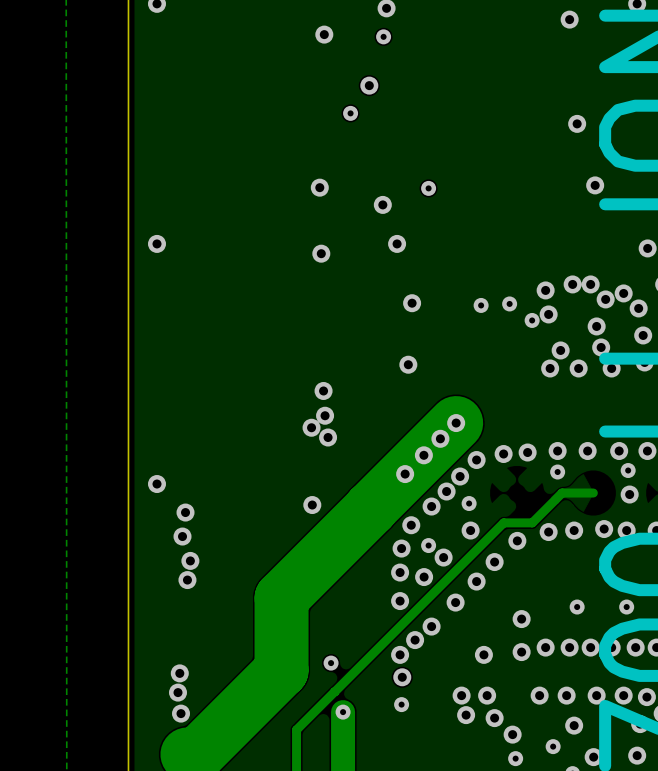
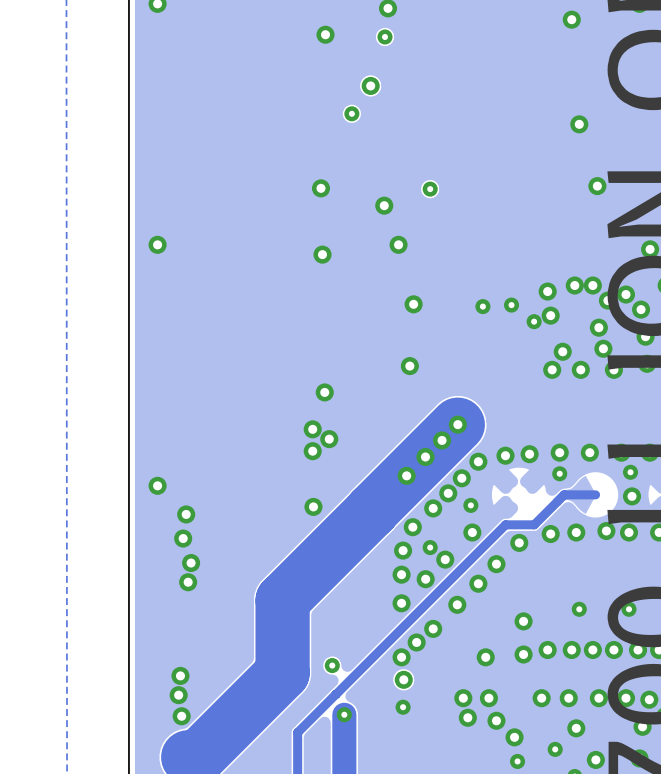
via position: (325, 415) -> (312, 451)

